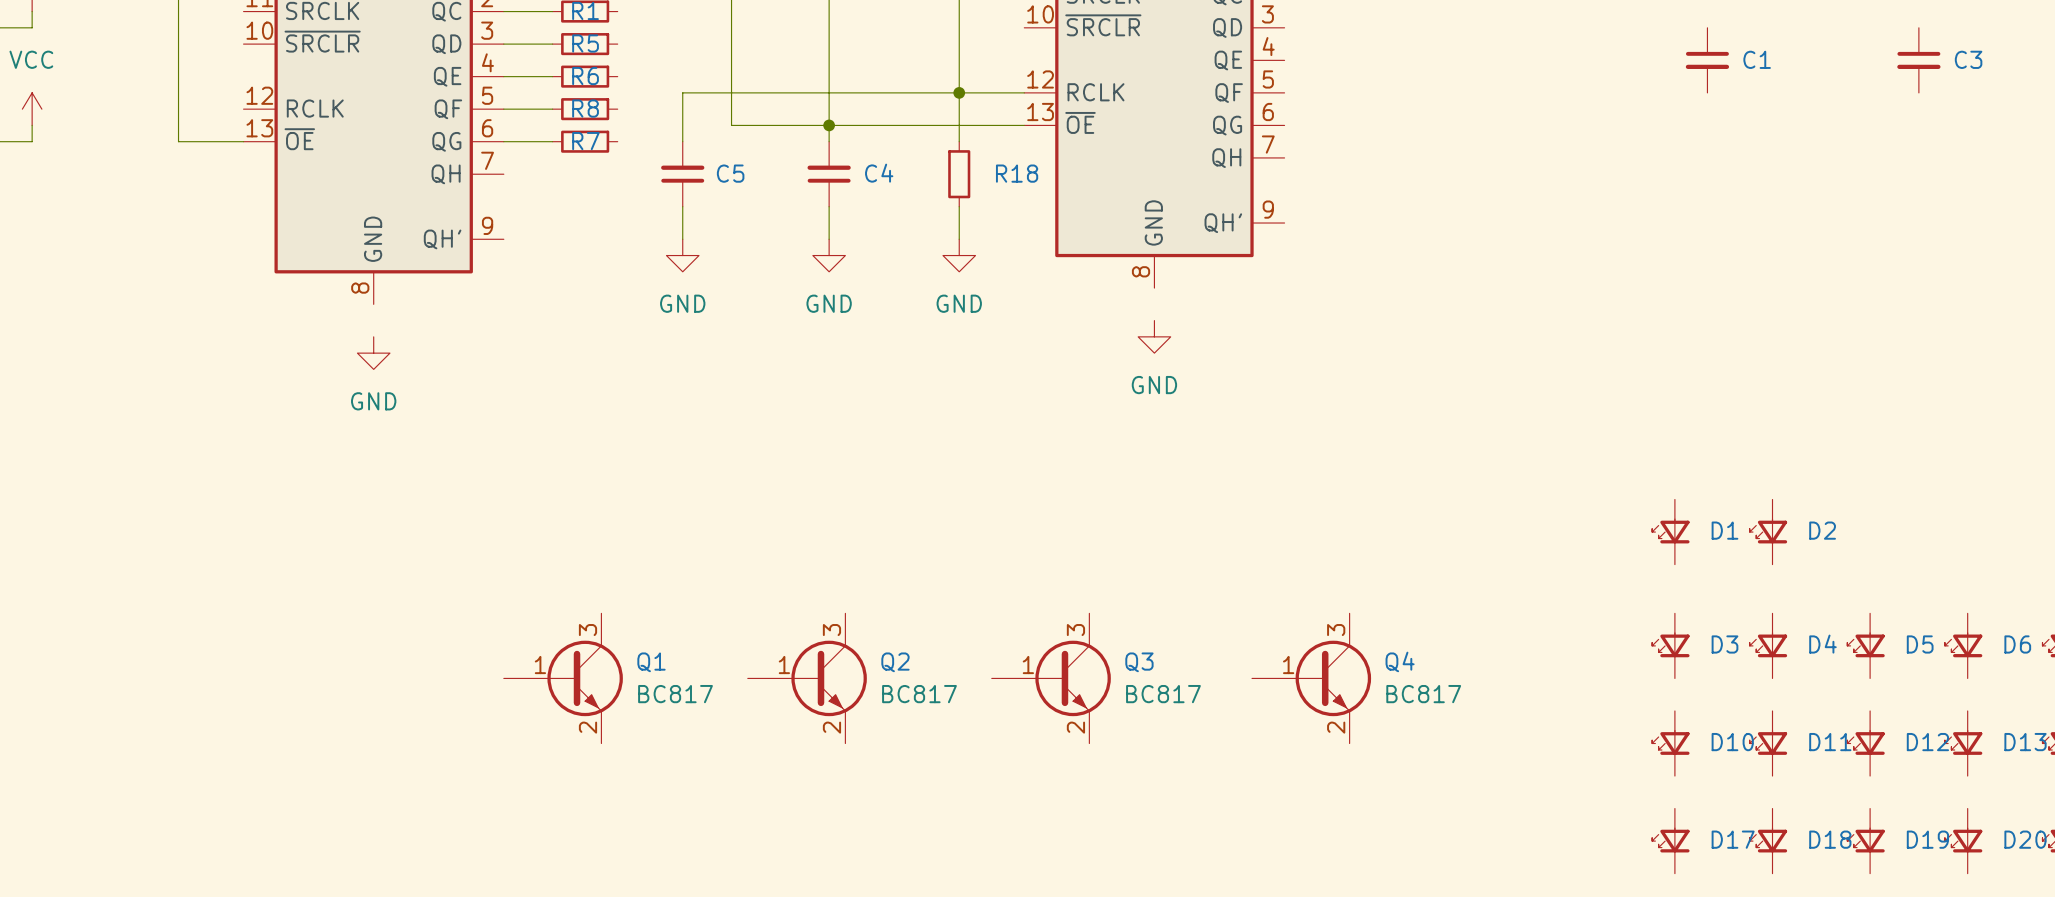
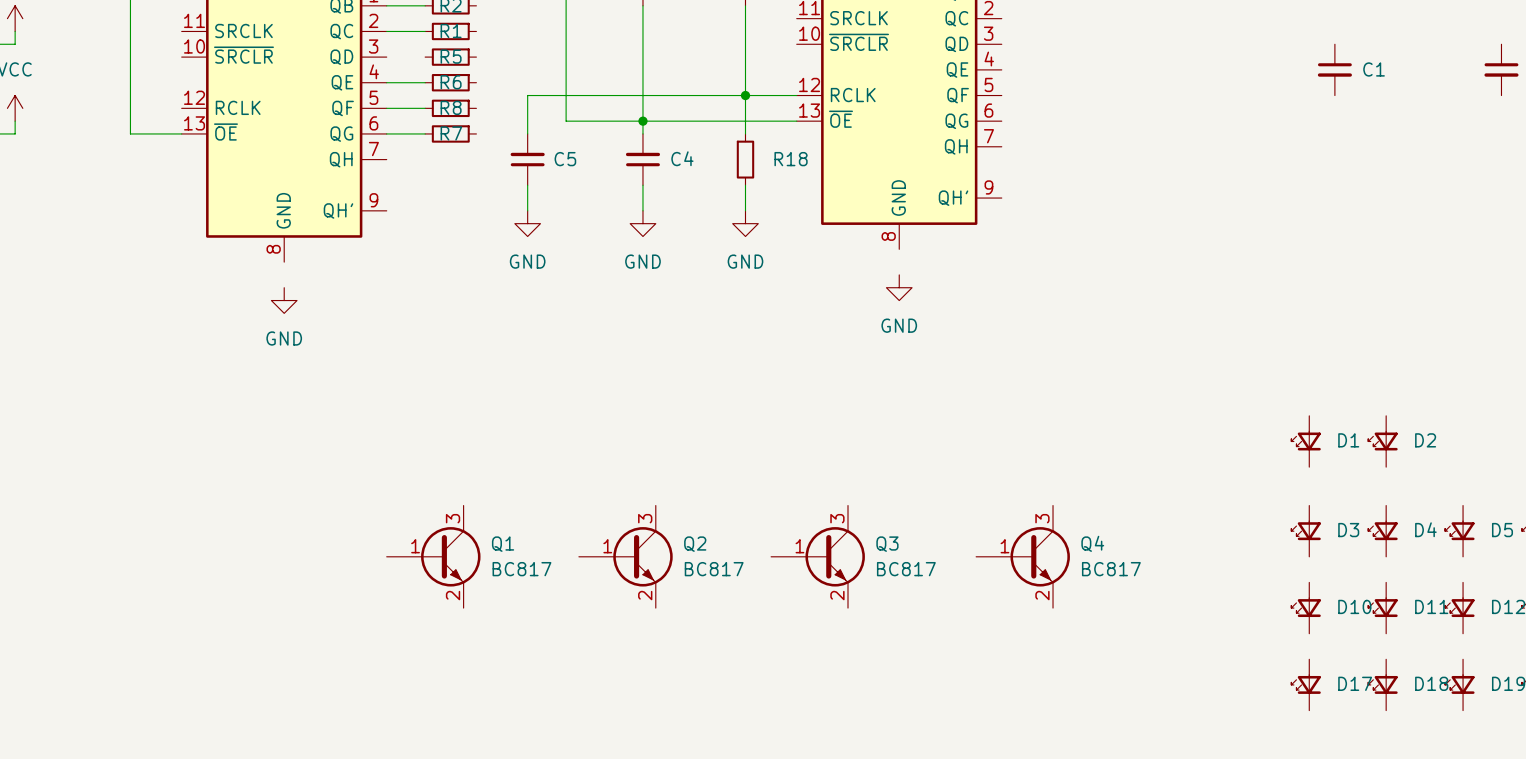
wire: (503, 44) (552, 44) -> none

